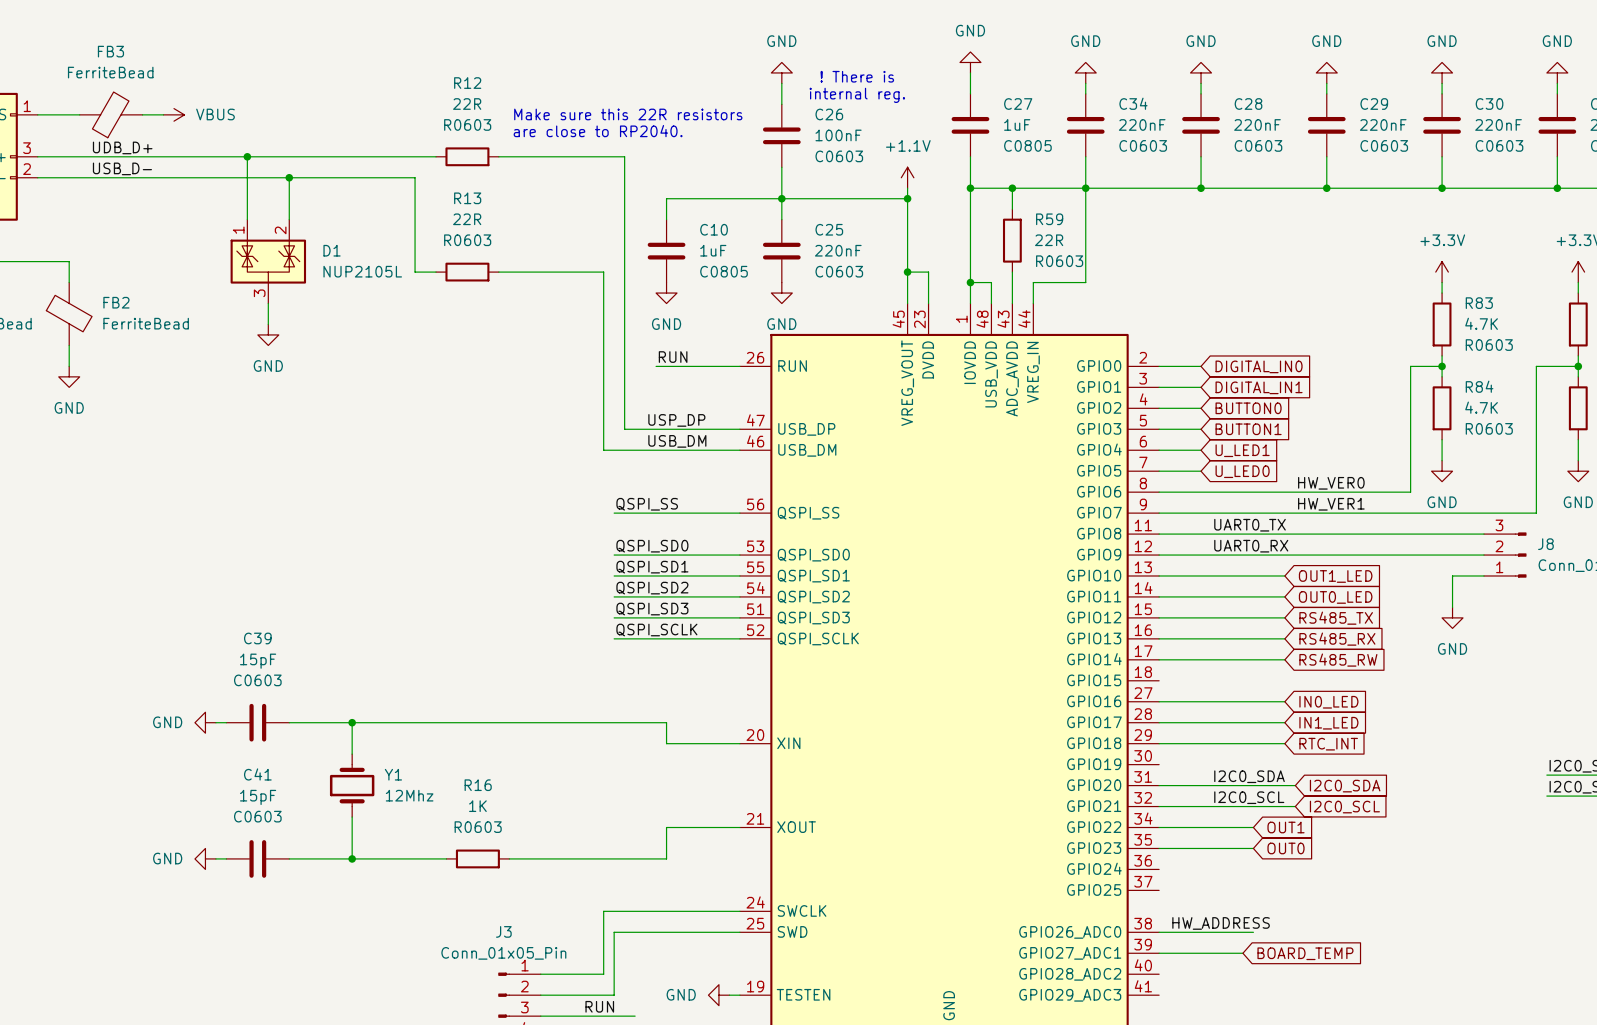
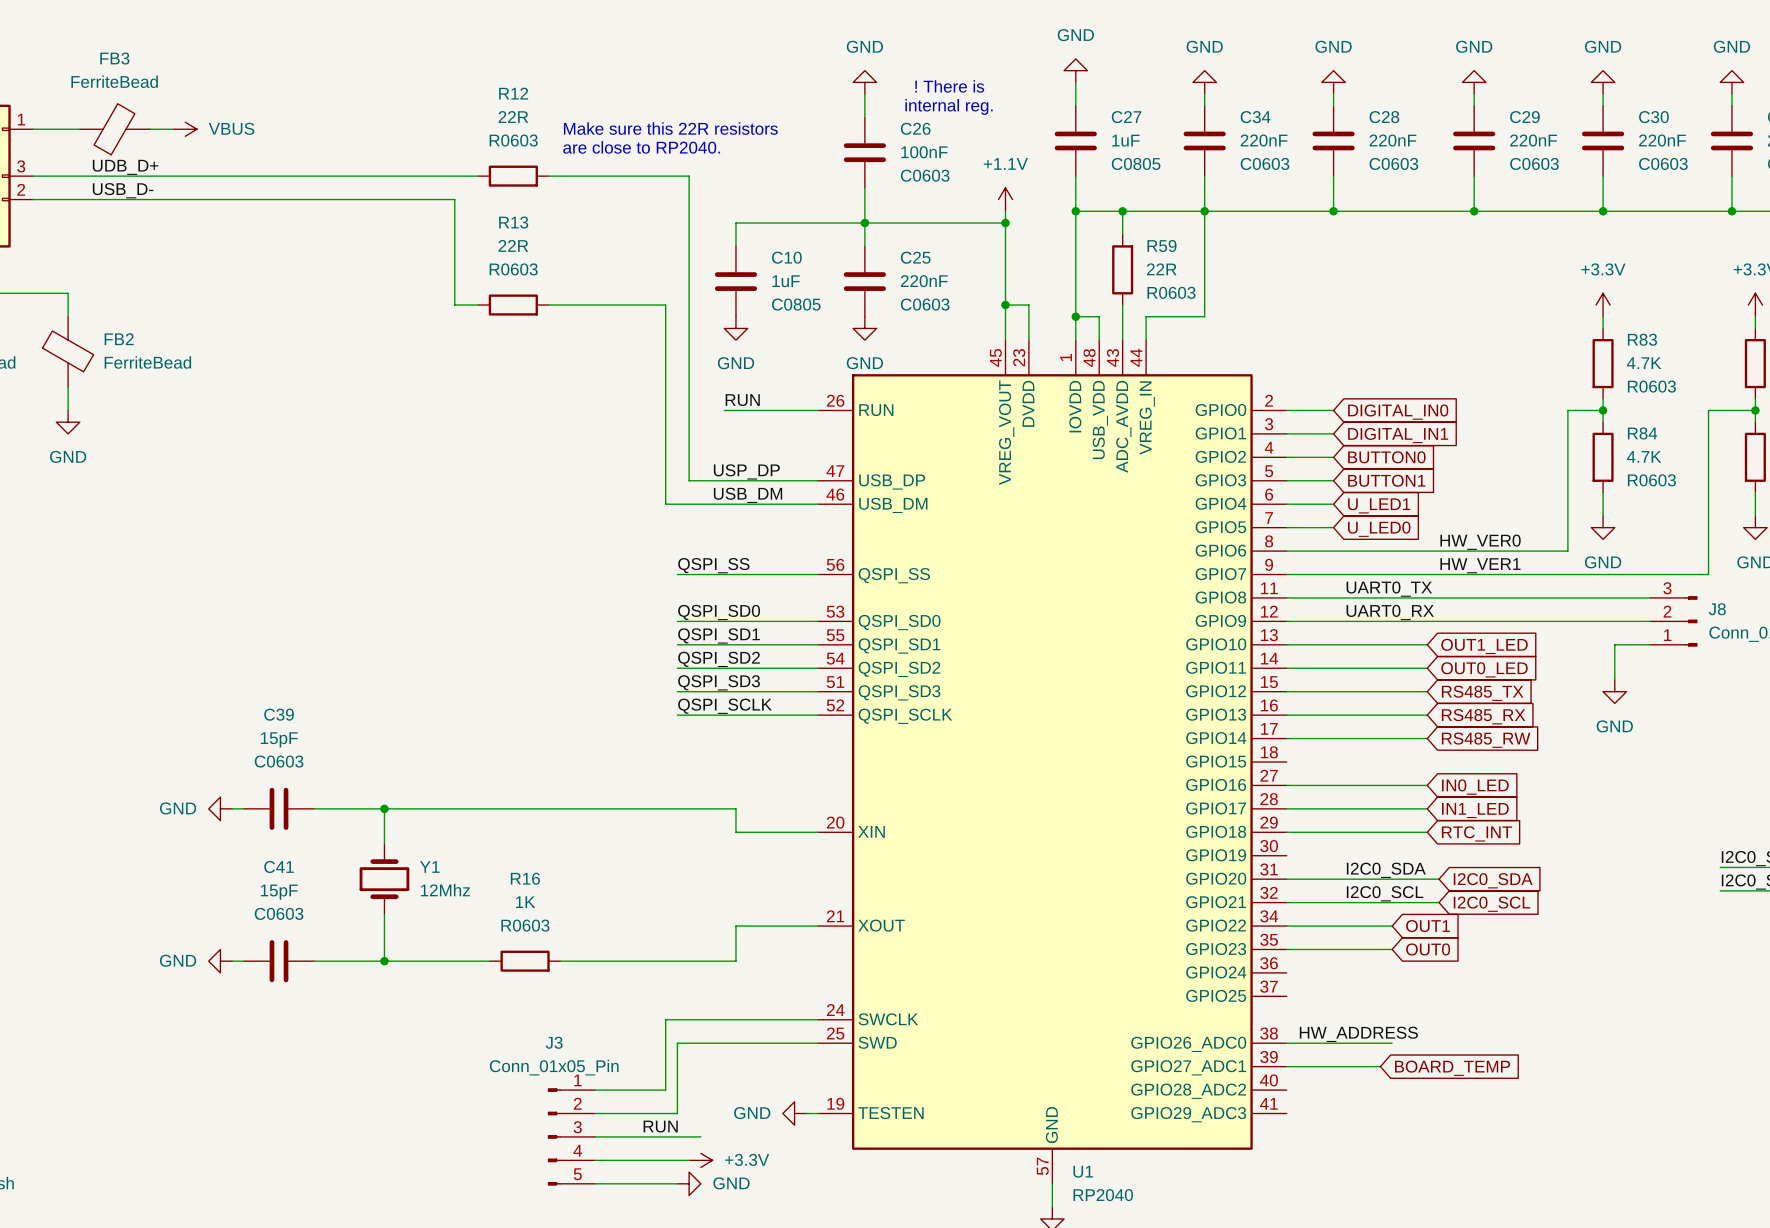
wire: (247, 156) (247, 219) -> none
junction: (247, 156) -> none
wire: (289, 177) (289, 219) -> none
junction: (289, 177) -> none
D1: NUP2105L (268, 261) -> none
wire: (268, 303) (268, 324) -> none
power symbol: GND (268, 334) -> none

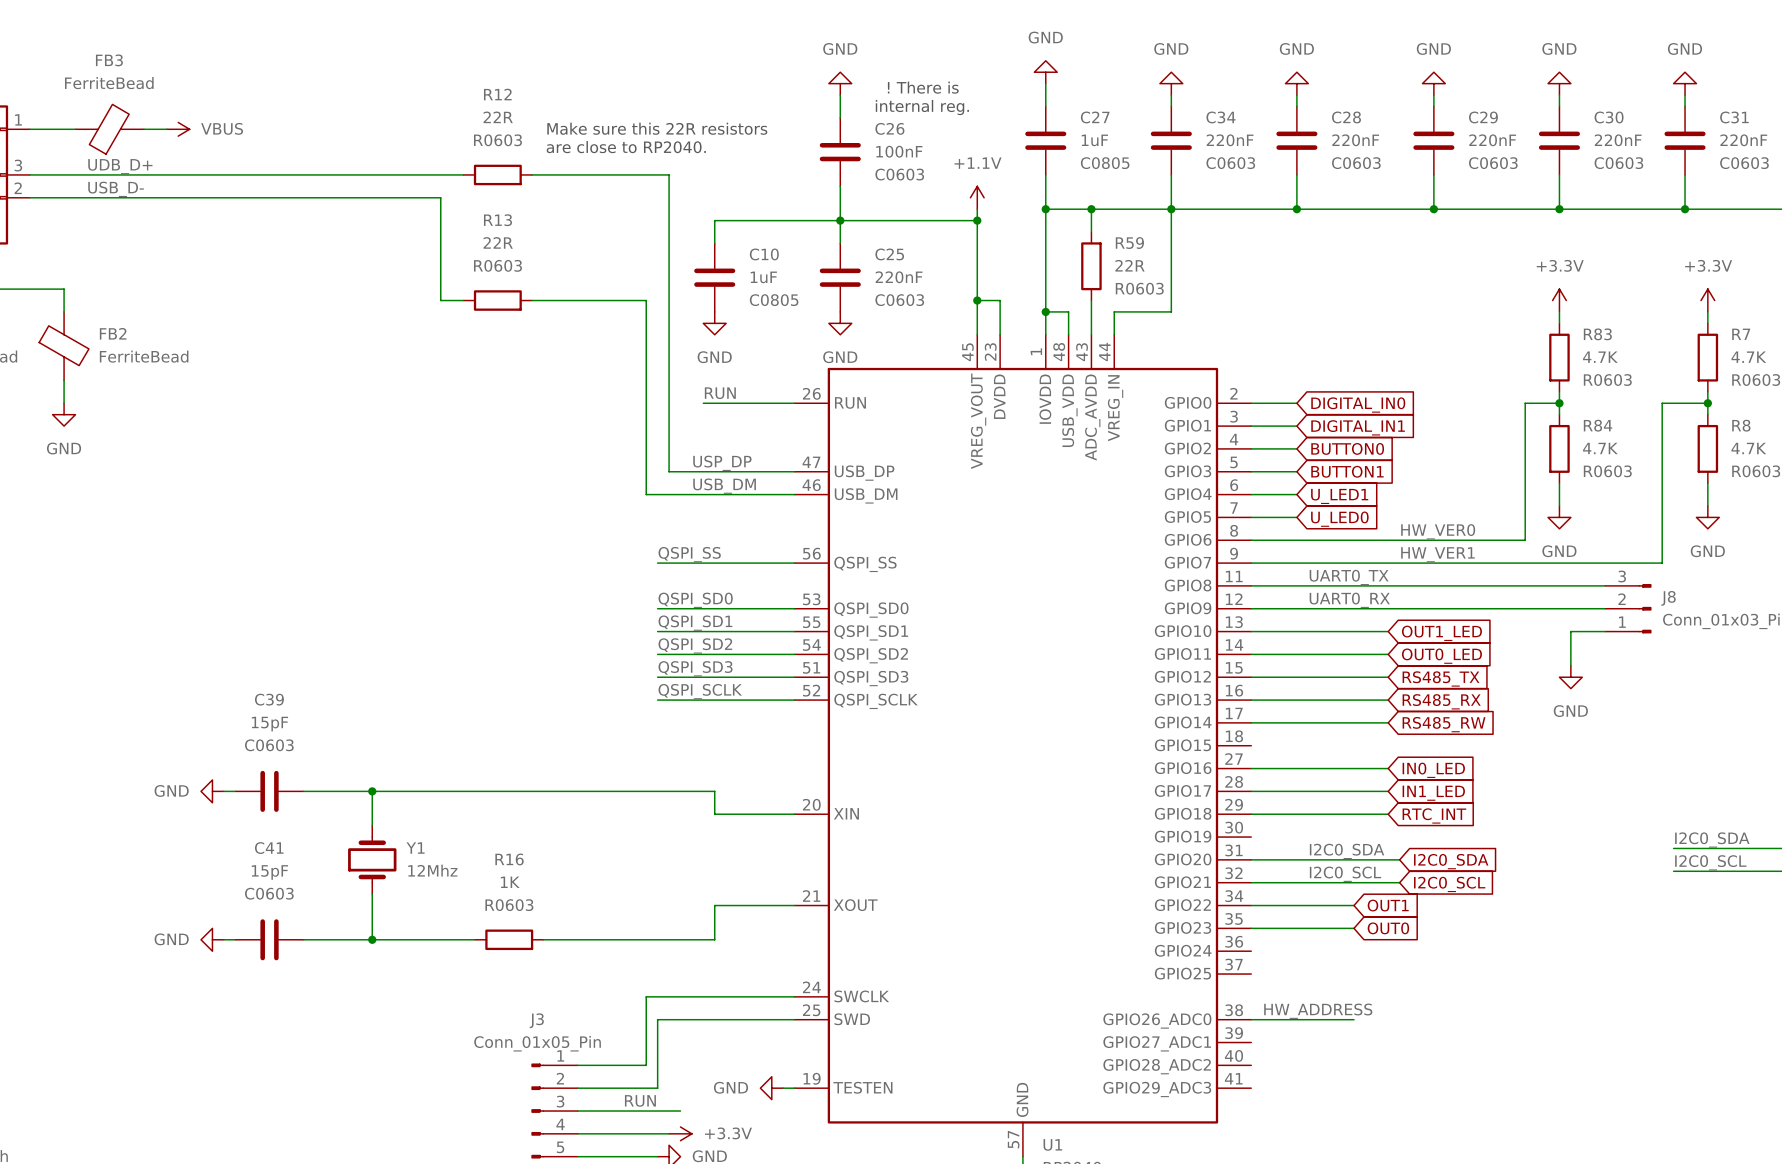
wire: (1286, 1066) (1380, 1066) -> none
global label: BOARD_TEMP (1452, 1068) -> none

